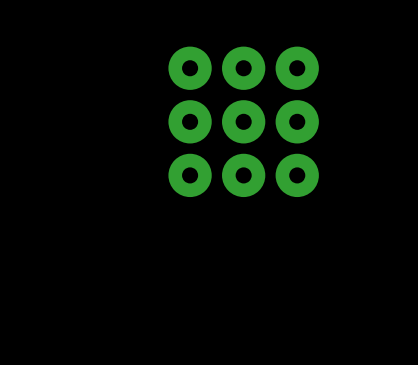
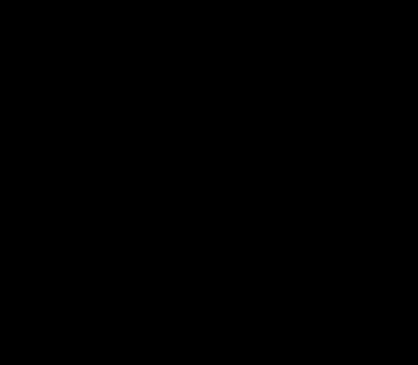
part: (243, 121) -> none

